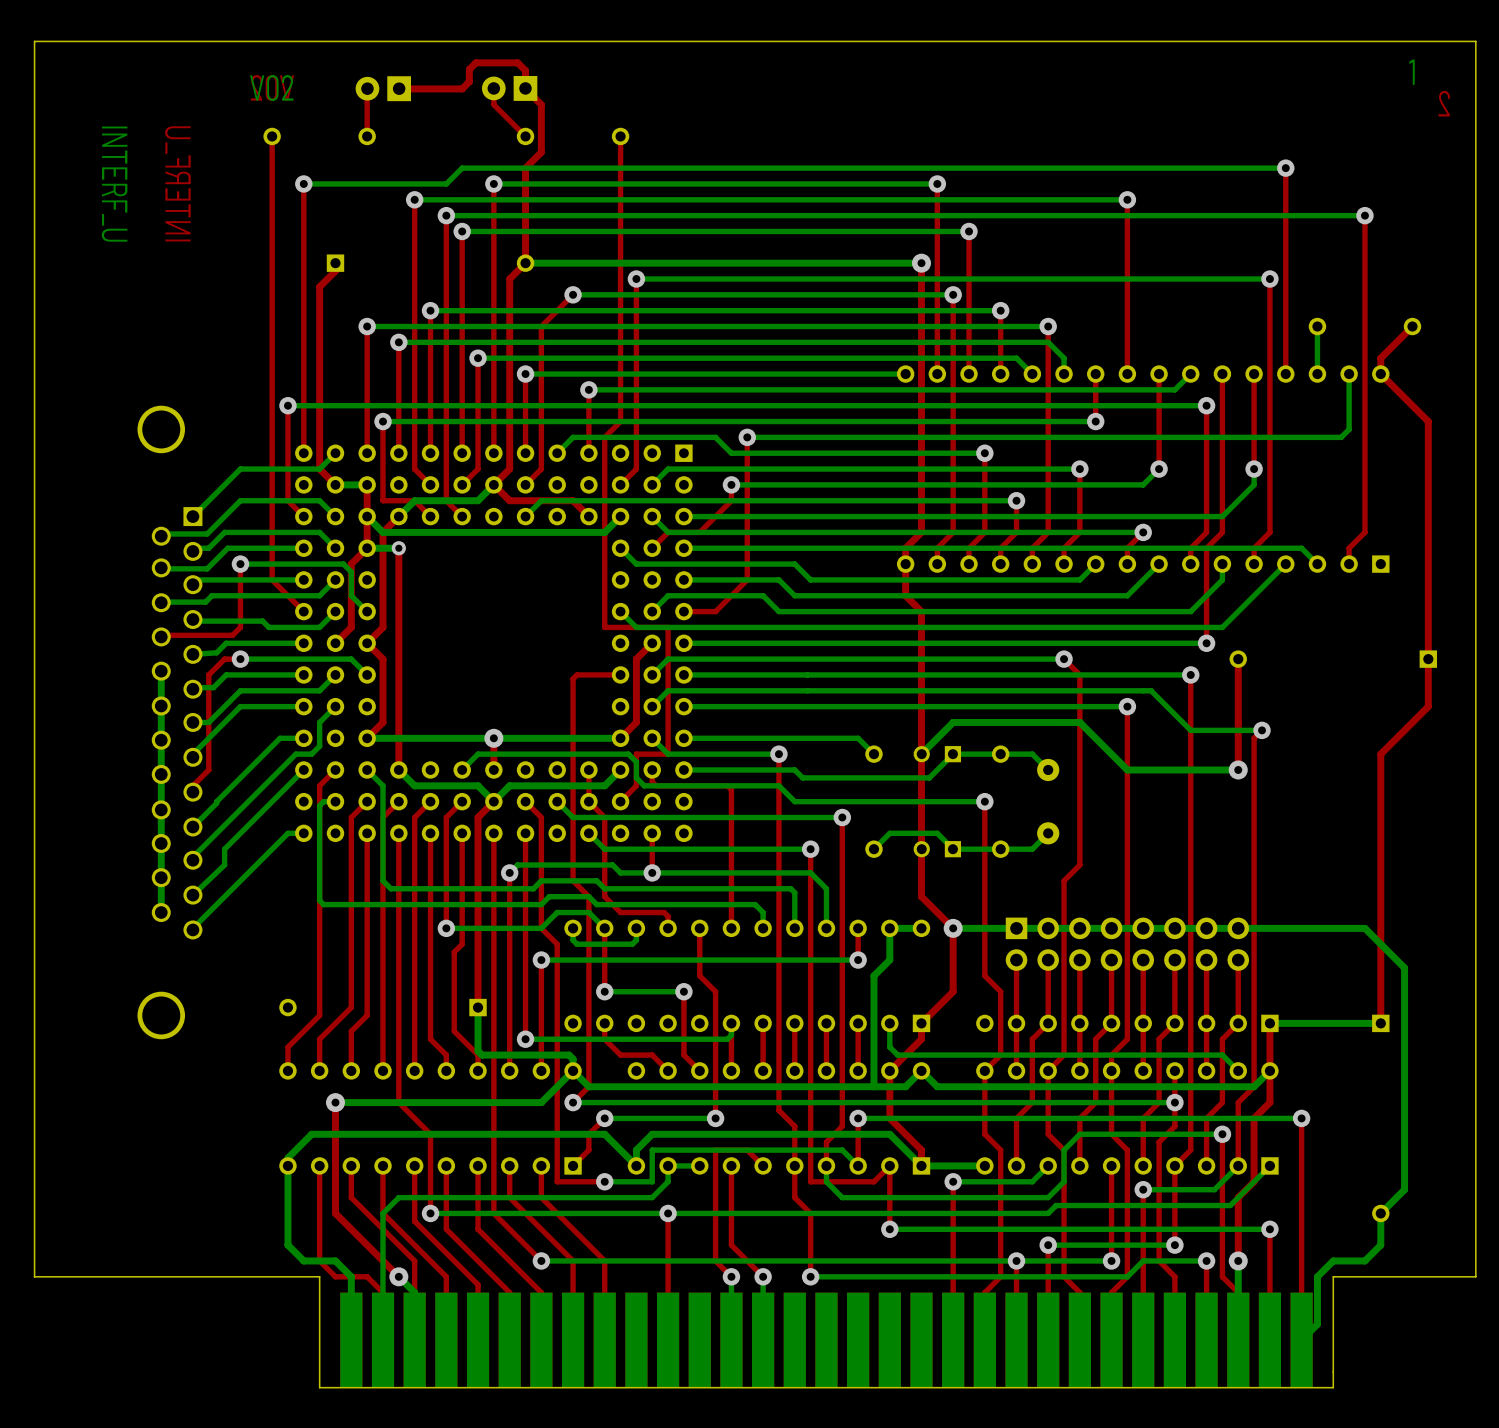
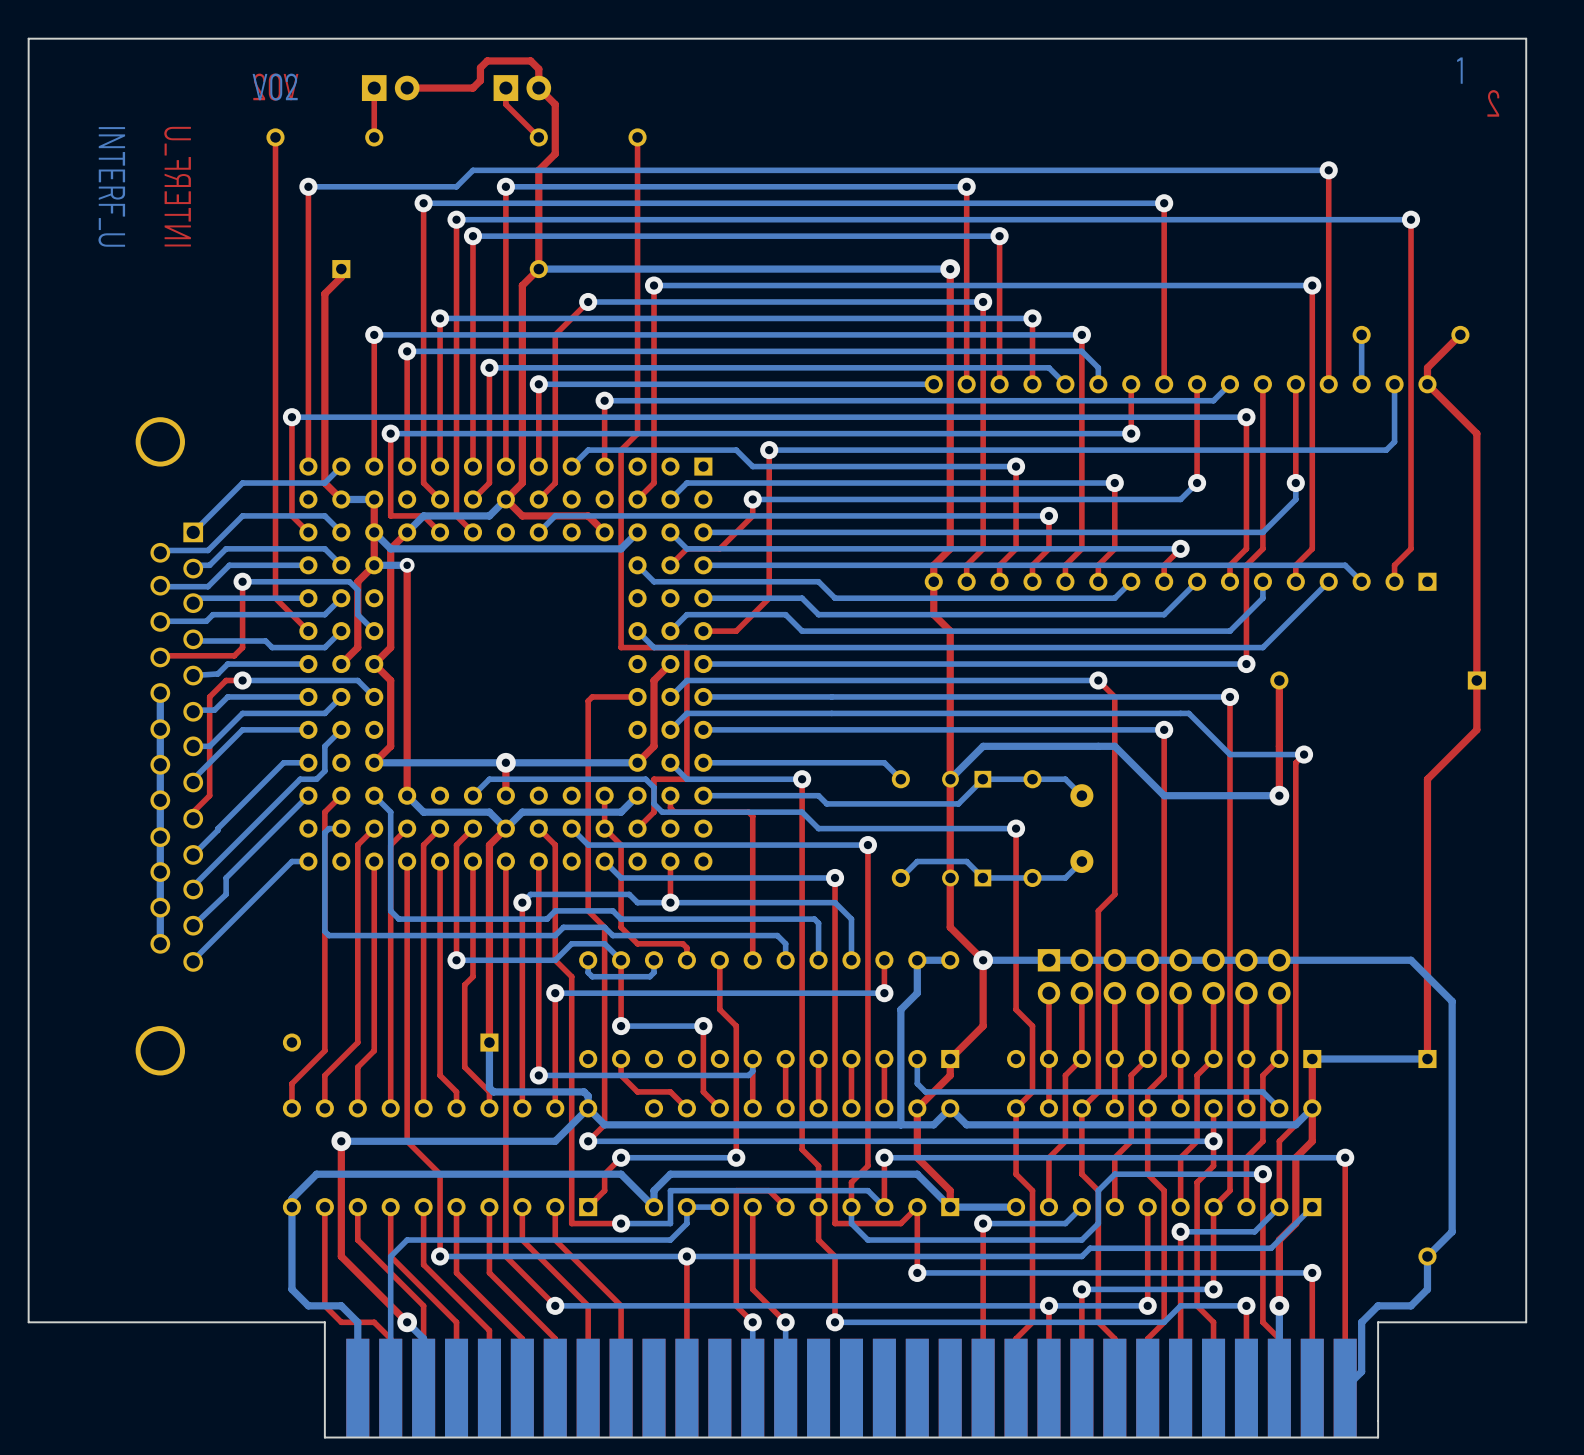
part rotation: 0° (383, 88) -> 180° (390, 88)
part rotation: 0° (509, 88) -> 180° (522, 88)

